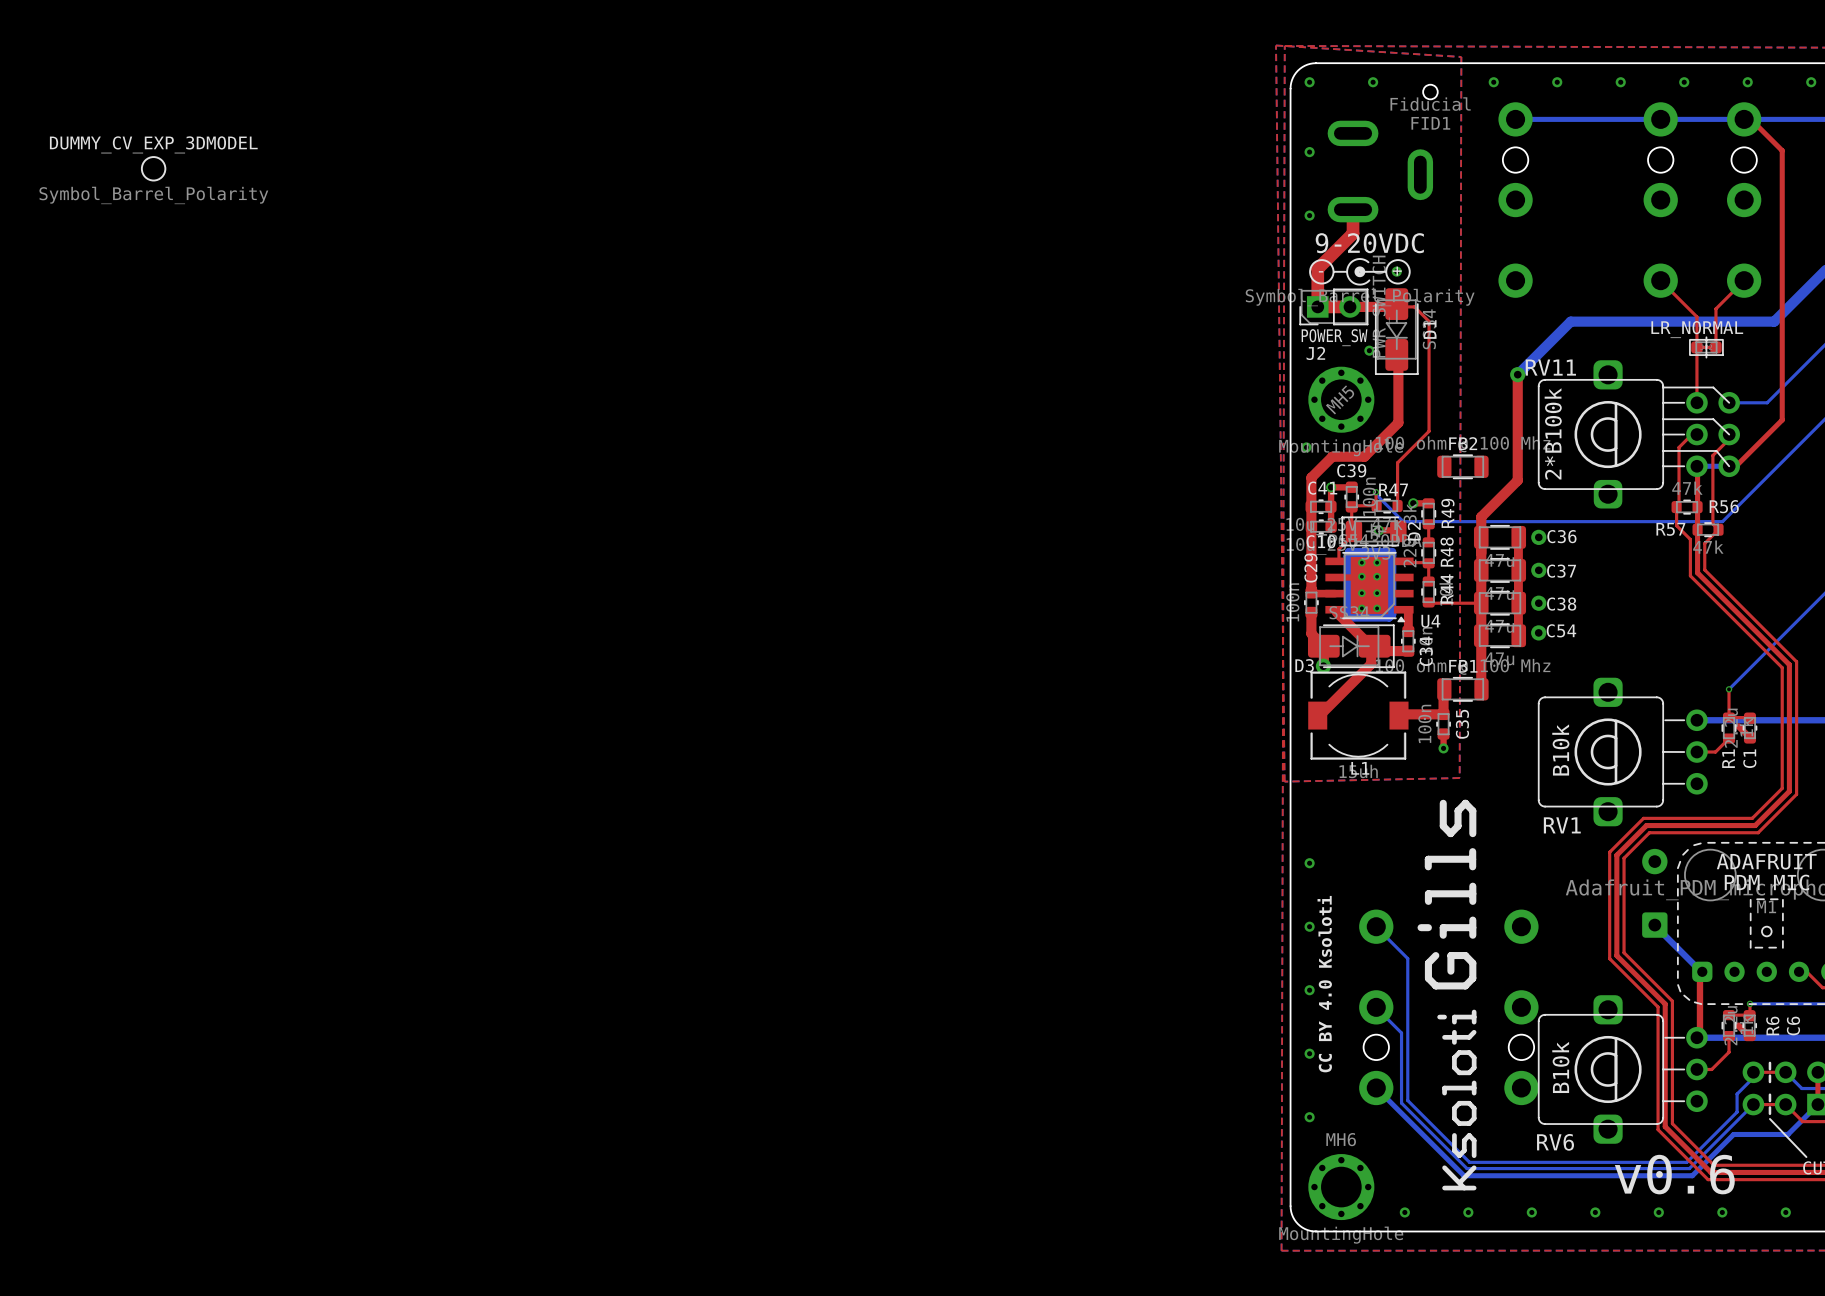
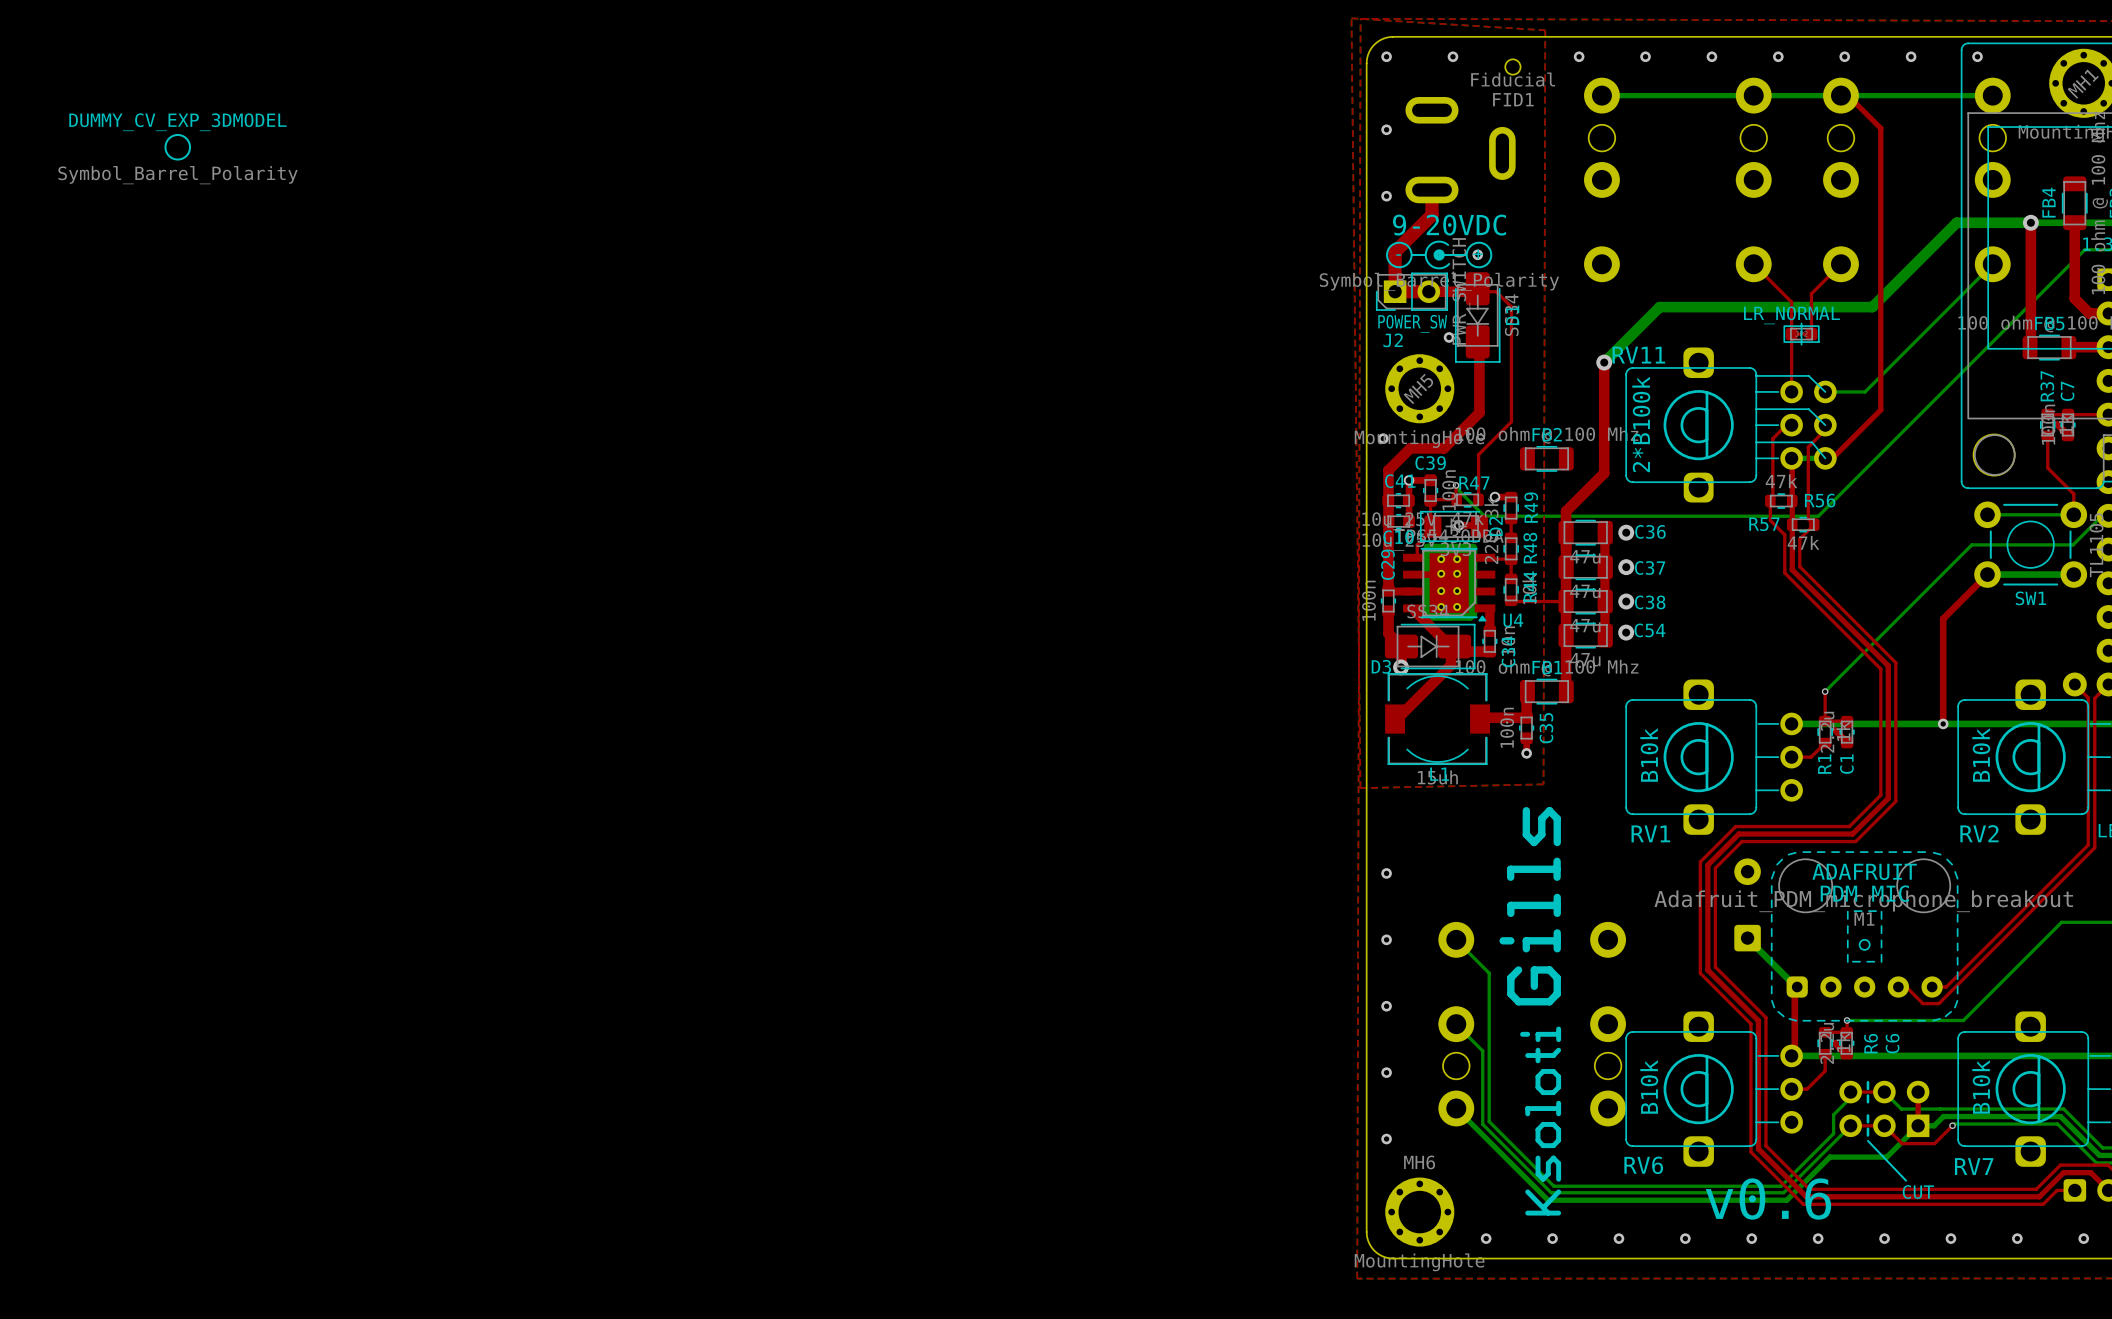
text: CC BY 4.0 Ksoloti (1324, 984) -> none

